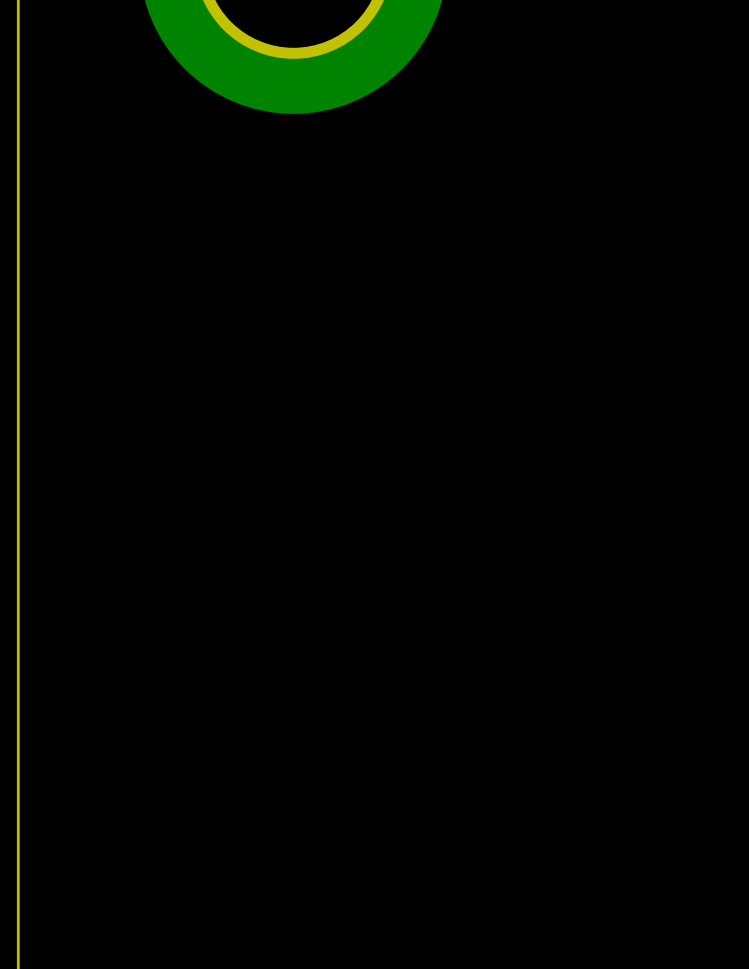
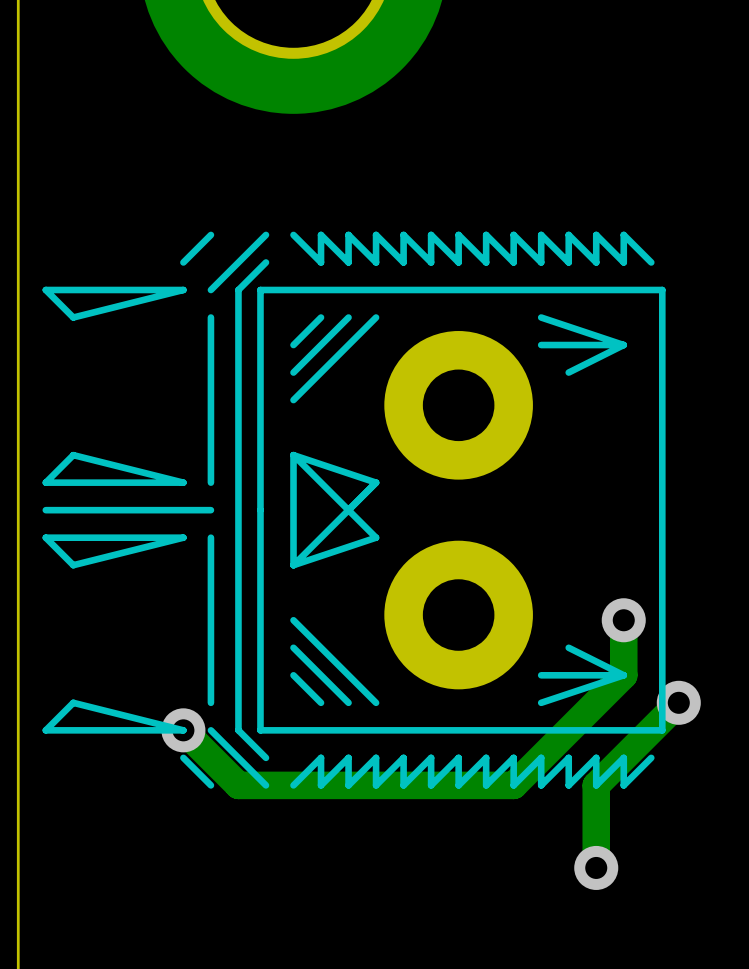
part: none -> (354, 510)
track: none -> (623, 620) (623, 675) (513, 785) (238, 785) (183, 730)
via: none -> (623, 620)
track: none -> (678, 702) (596, 785) (596, 867)
via: none -> (678, 702)
via: none -> (183, 730)
via: none -> (596, 867)

